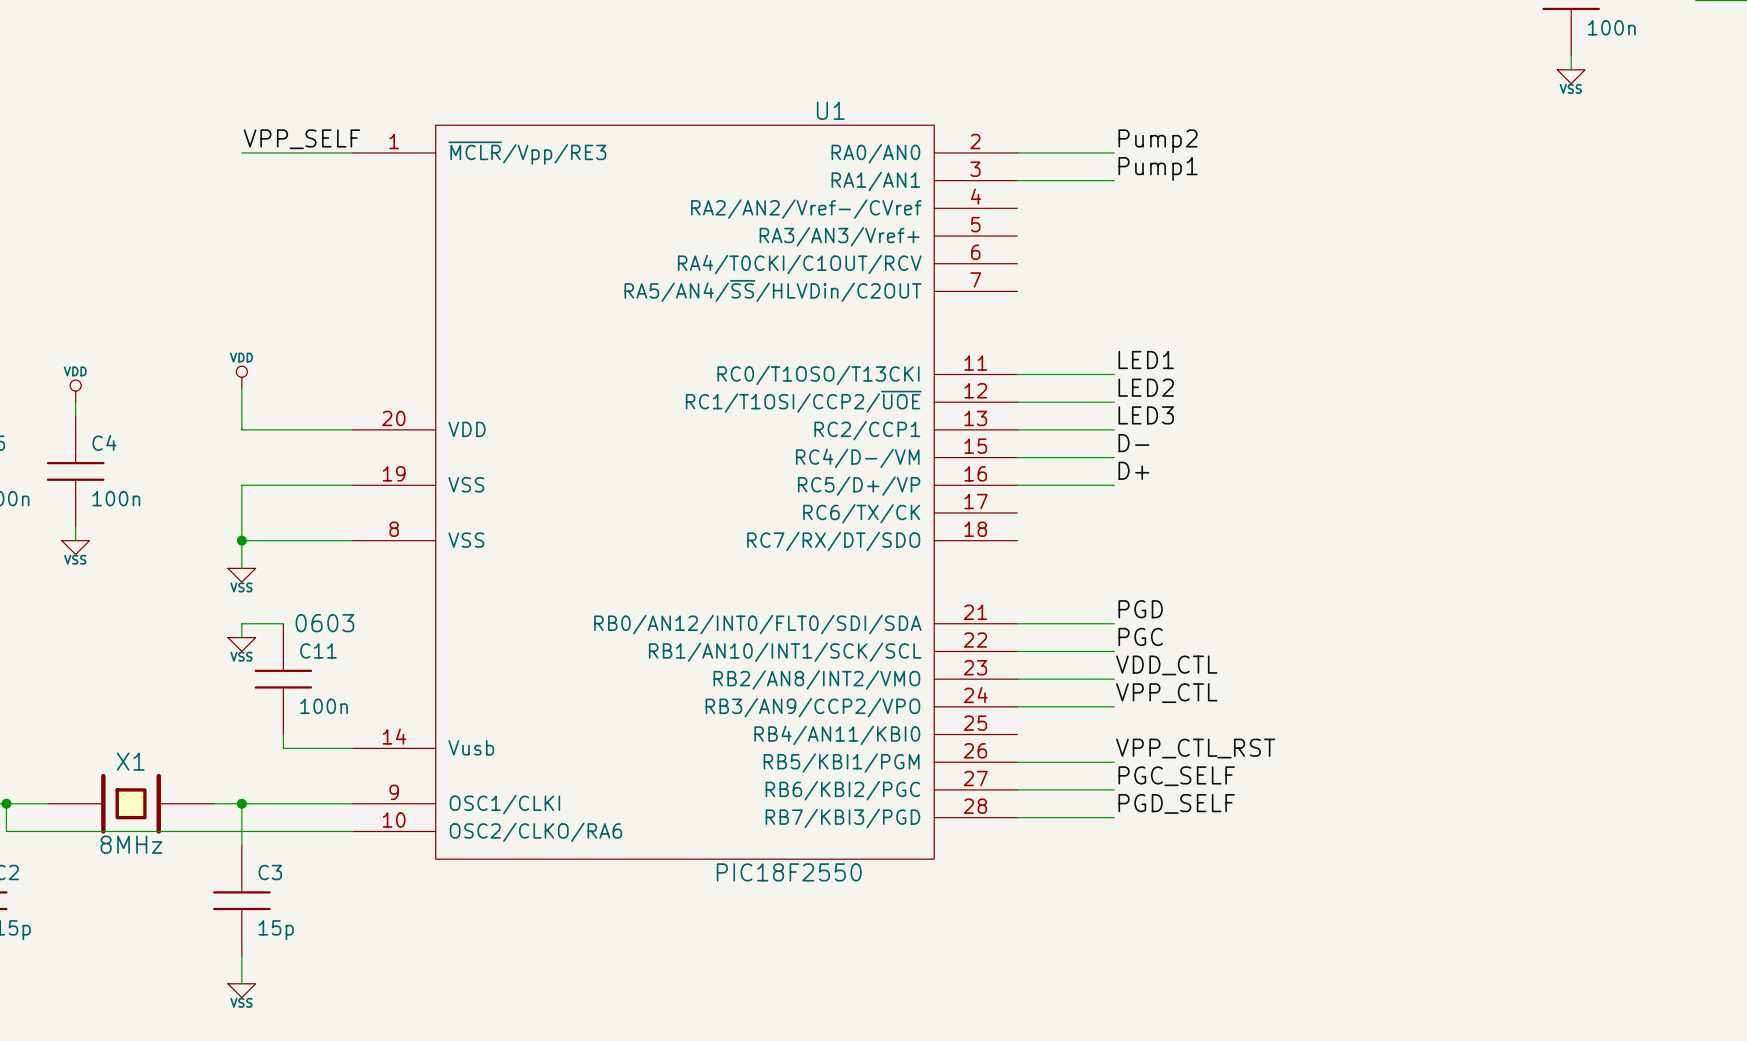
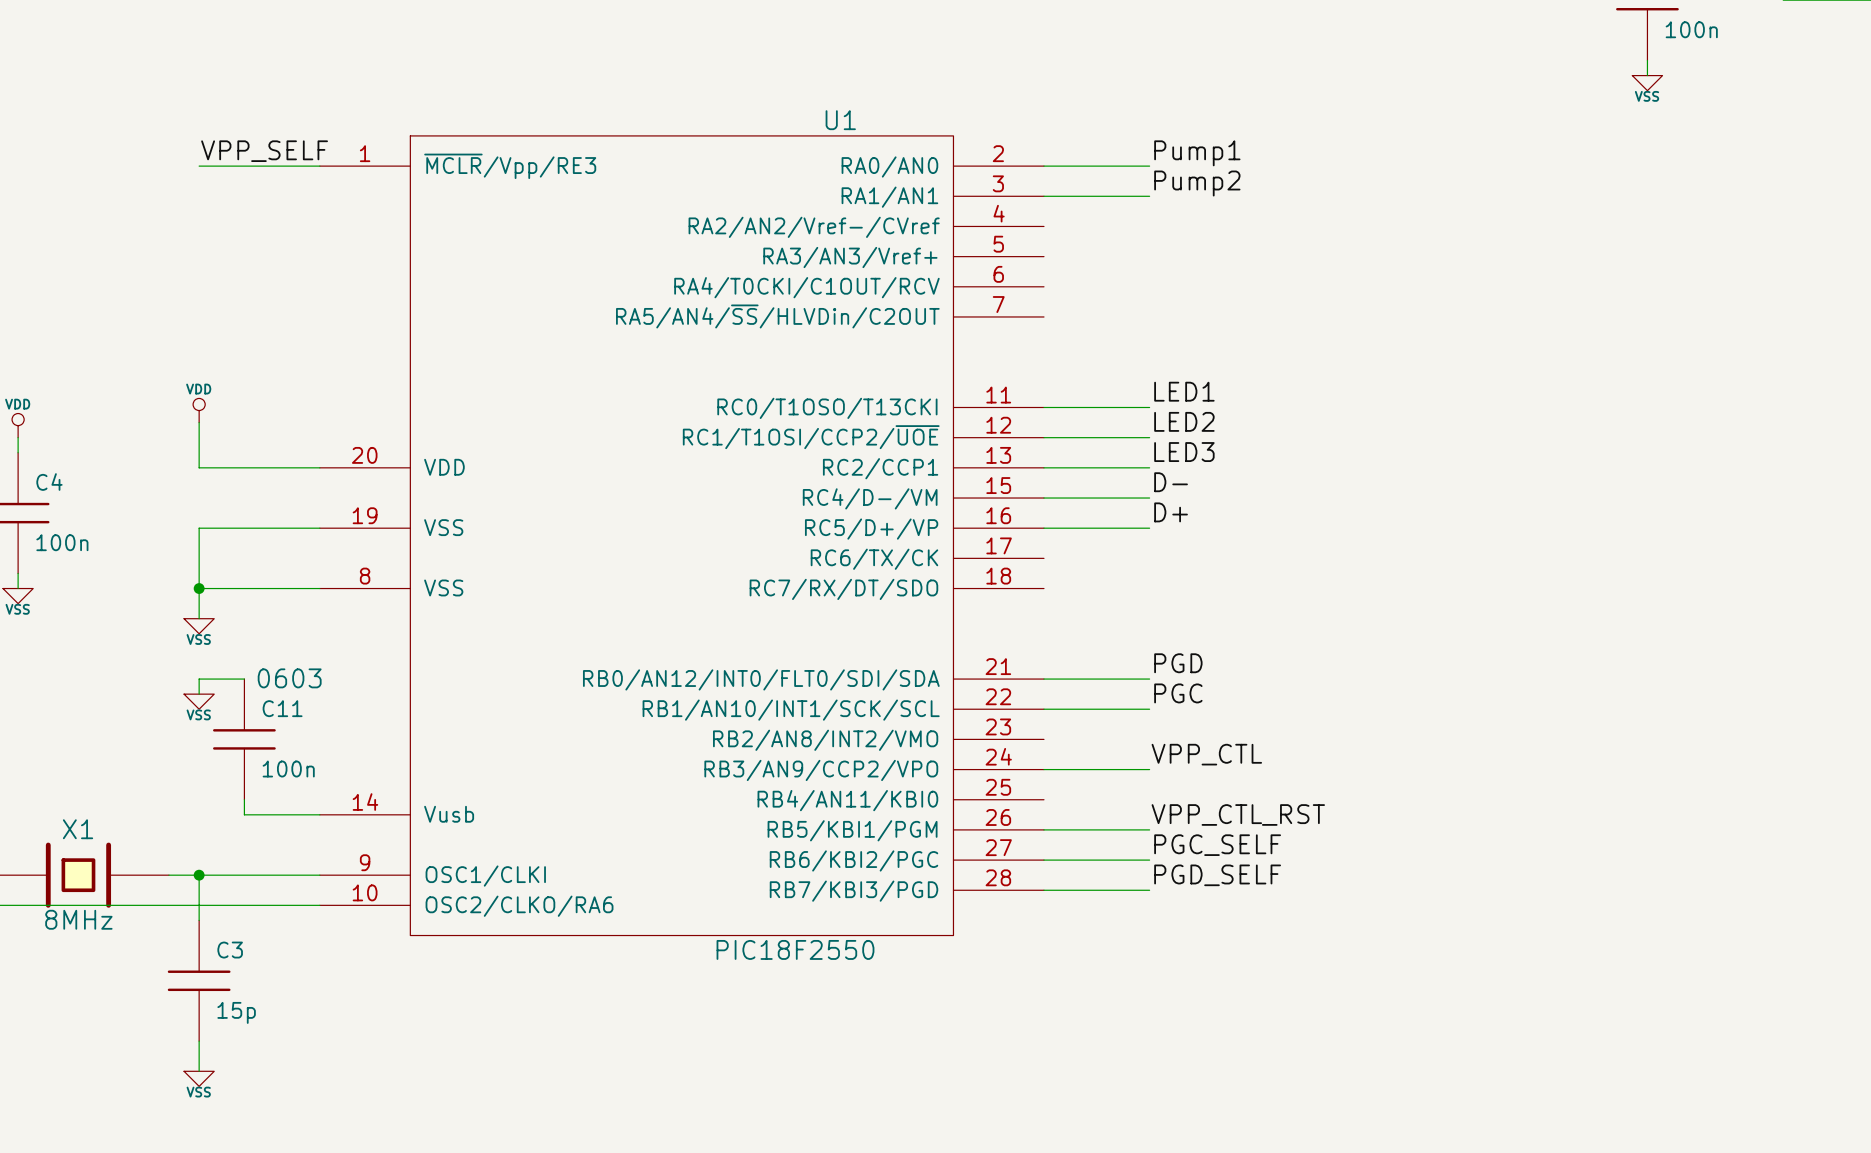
label: Pump2 (1158, 141) -> Pump1 (1197, 153)
label: Pump1 (1158, 168) -> Pump2 (1197, 183)
label: VDD_CTL (1166, 665) -> none
wire: (1017, 679) (1114, 679) -> none

